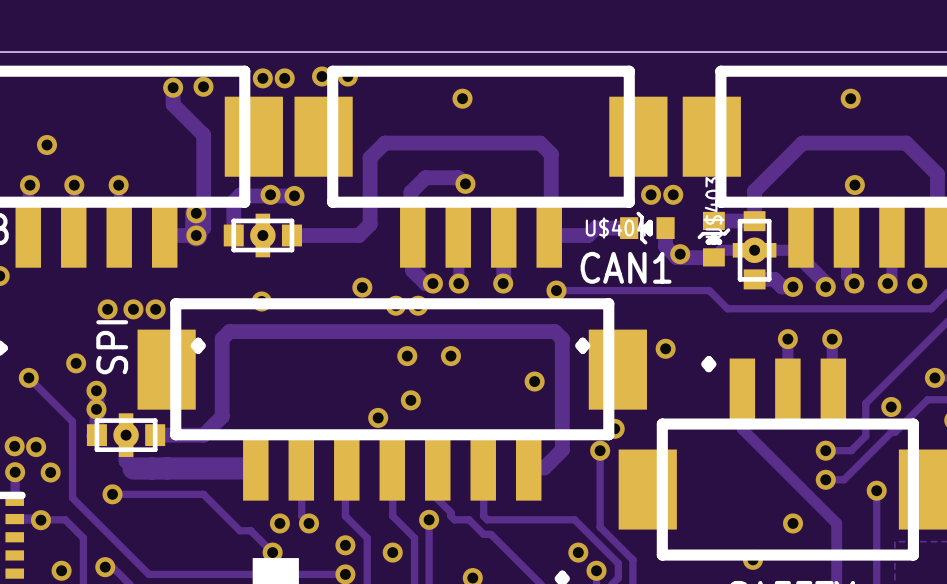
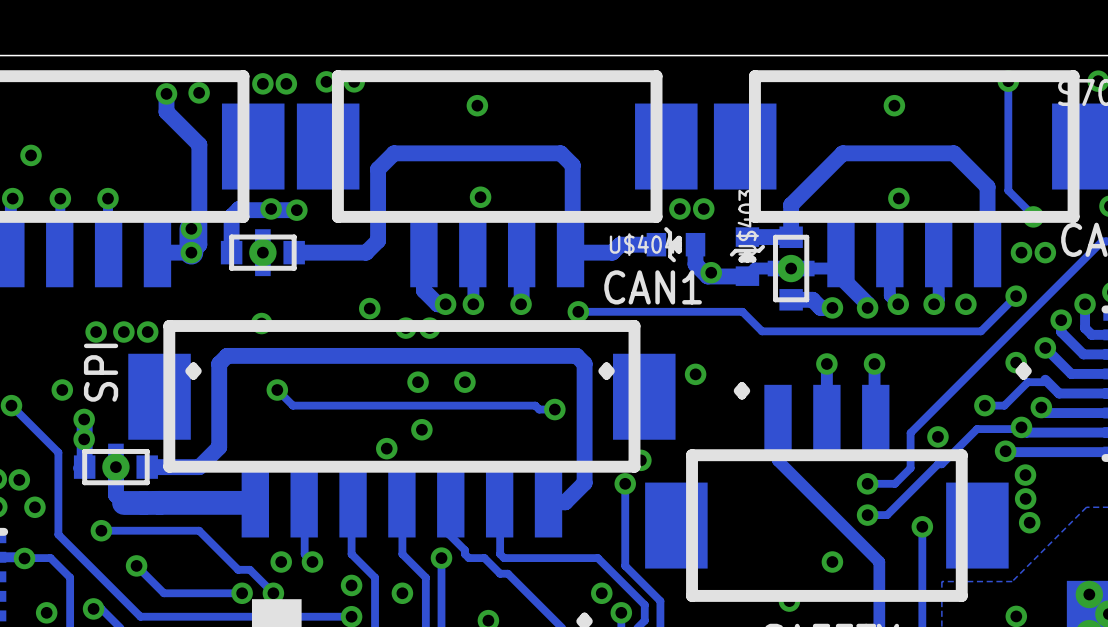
track: (465, 185) (458, 177) (425, 177) (410, 192) (410, 233) (412, 234) -> none
track: none -> (277, 389) (292, 405) (535, 405) (539, 409) (554, 409)
via: none -> (277, 389)
track: none -> (136, 565) (163, 593) (242, 593)
via: none -> (136, 565)
via: none -> (242, 593)

